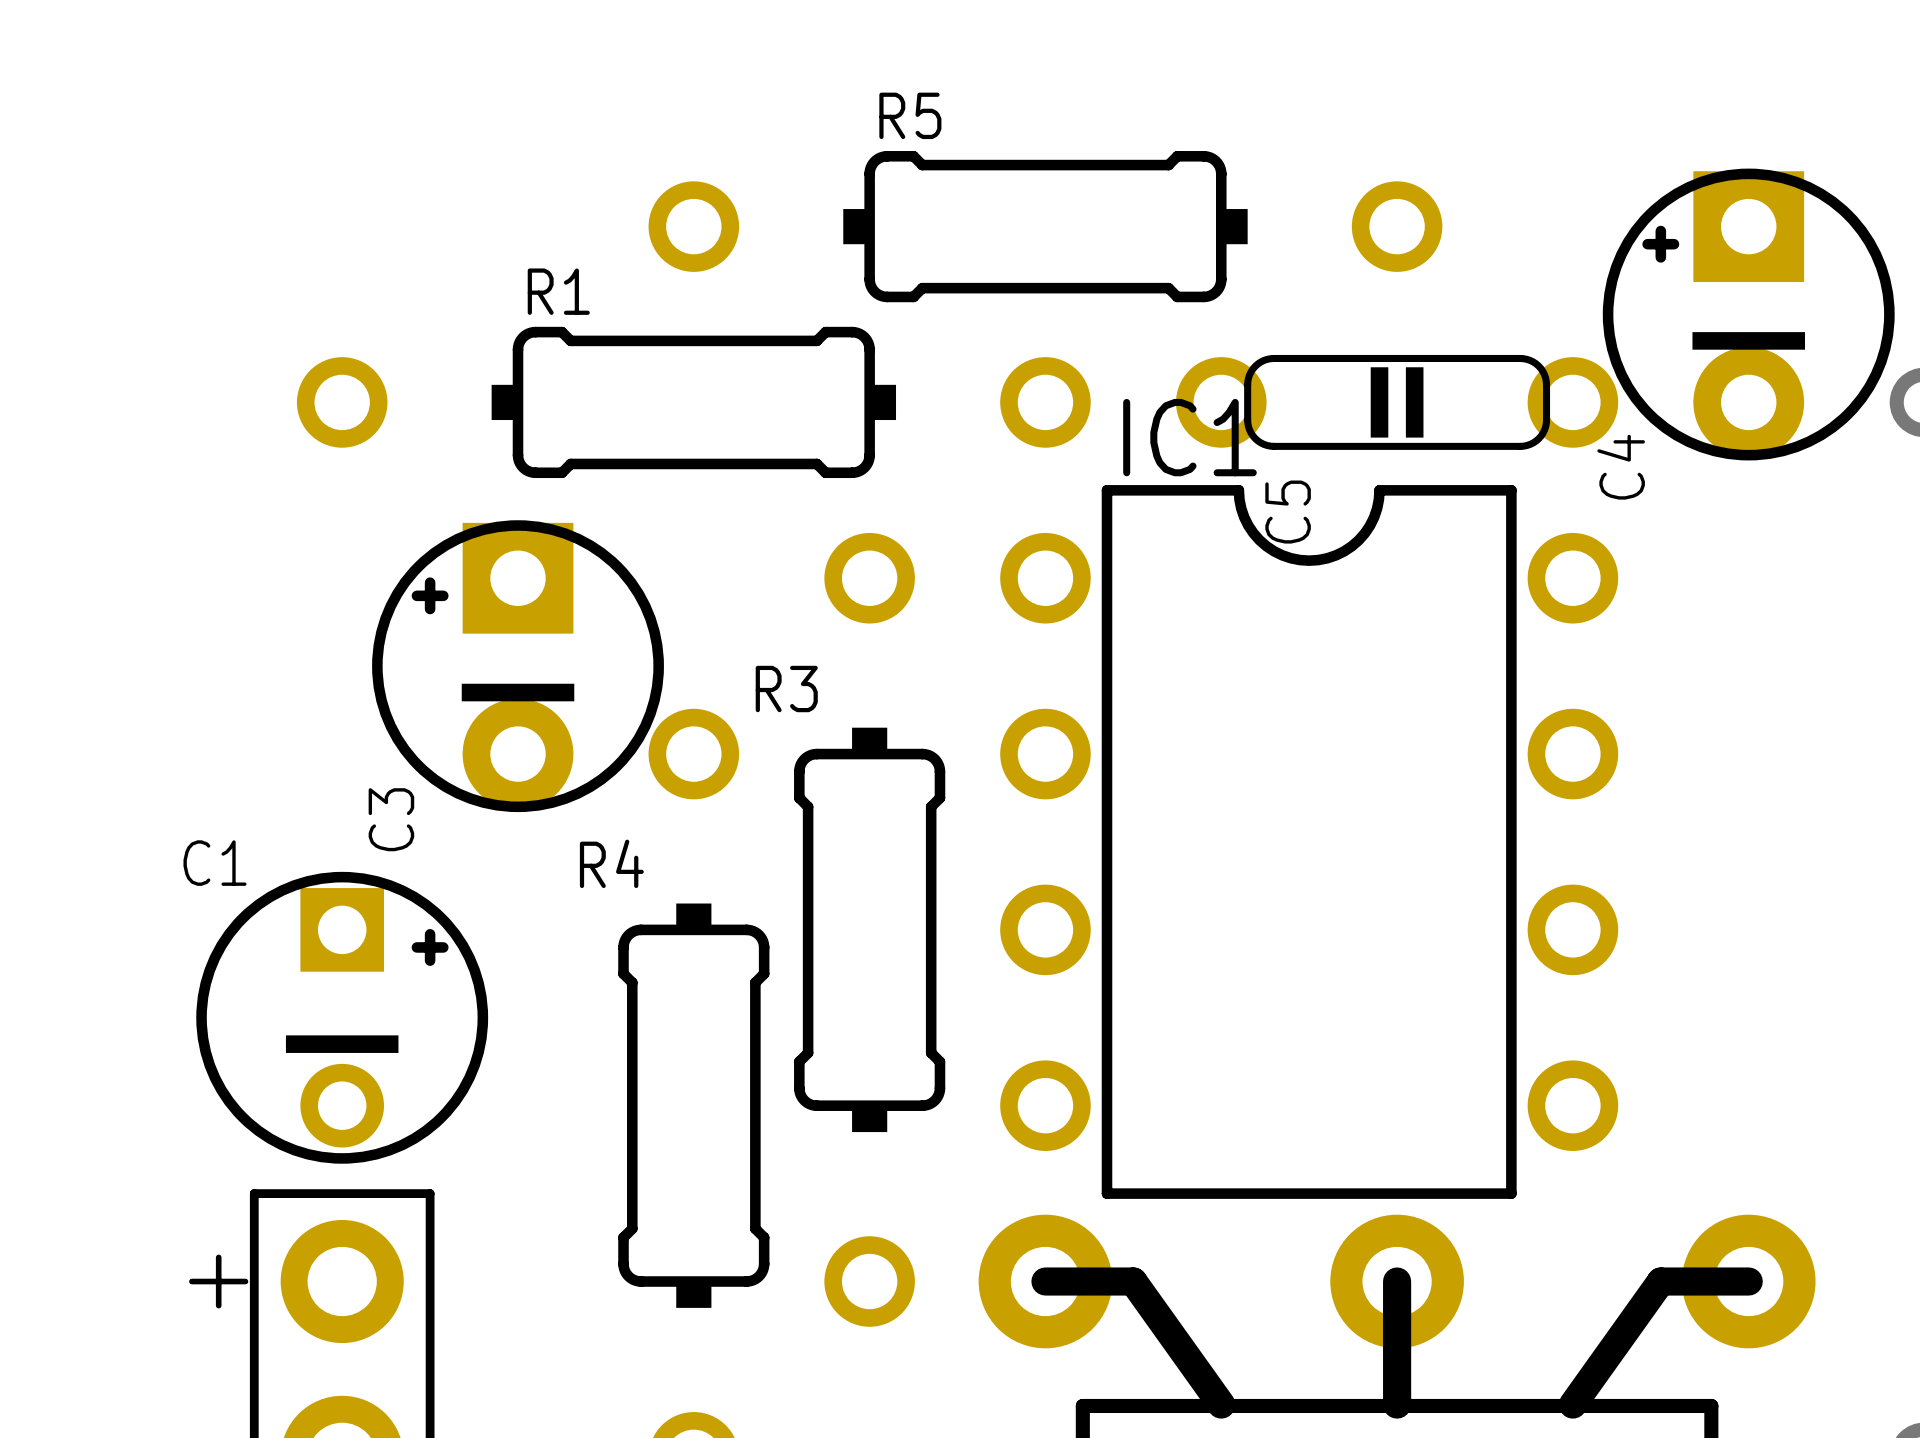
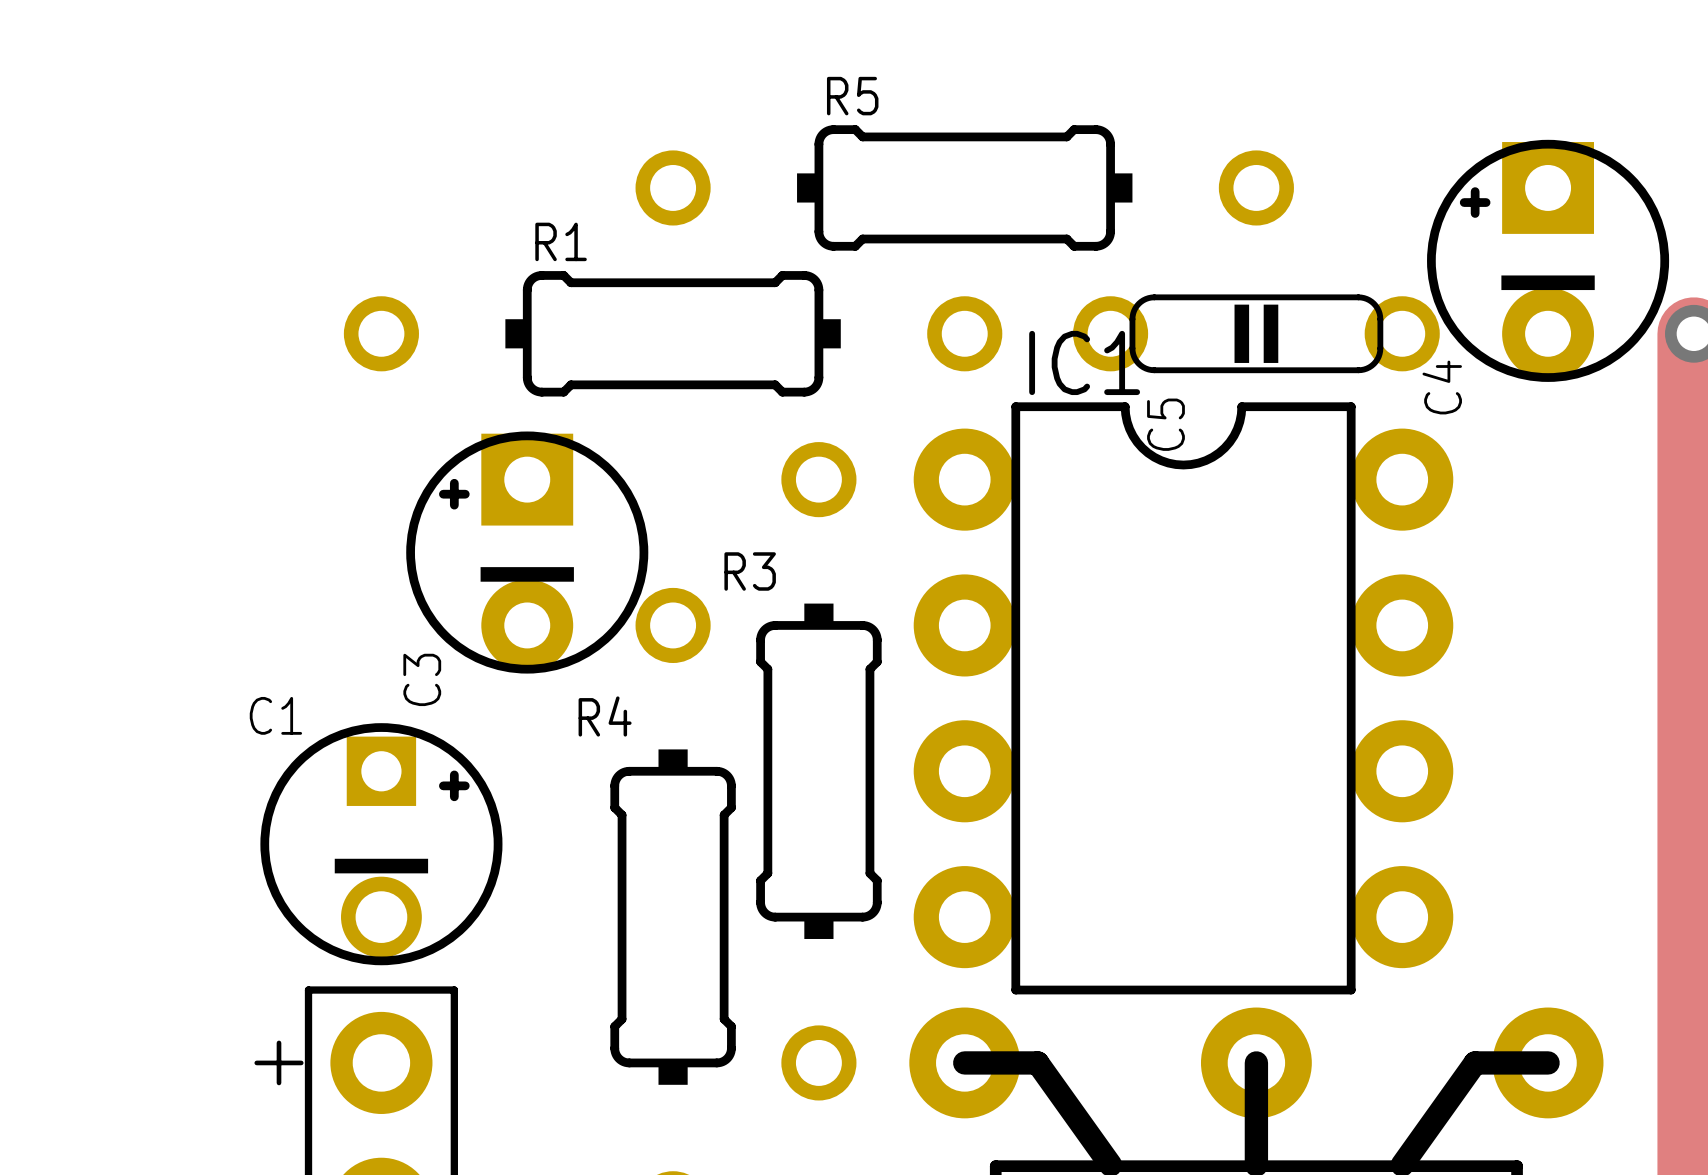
IC1 footprint: [1000, 485, 1619, 1199] -> [913, 402, 1454, 995]
C1 footprint: [196, 871, 489, 1164] -> [260, 723, 503, 966]

